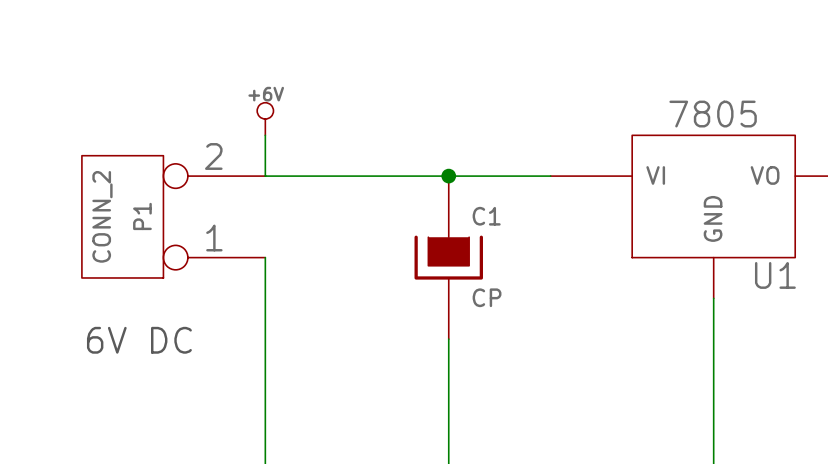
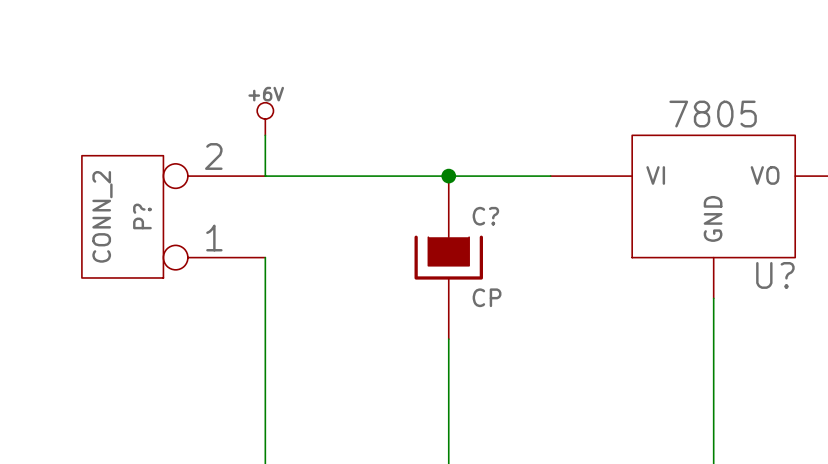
P1 name: P1 (142, 216) -> P? (142, 216)
C1 name: C1 (486, 216) -> C? (485, 216)
U1 name: U1 (775, 275) -> U? (775, 275)
text: 6V DC (139, 340) -> none

